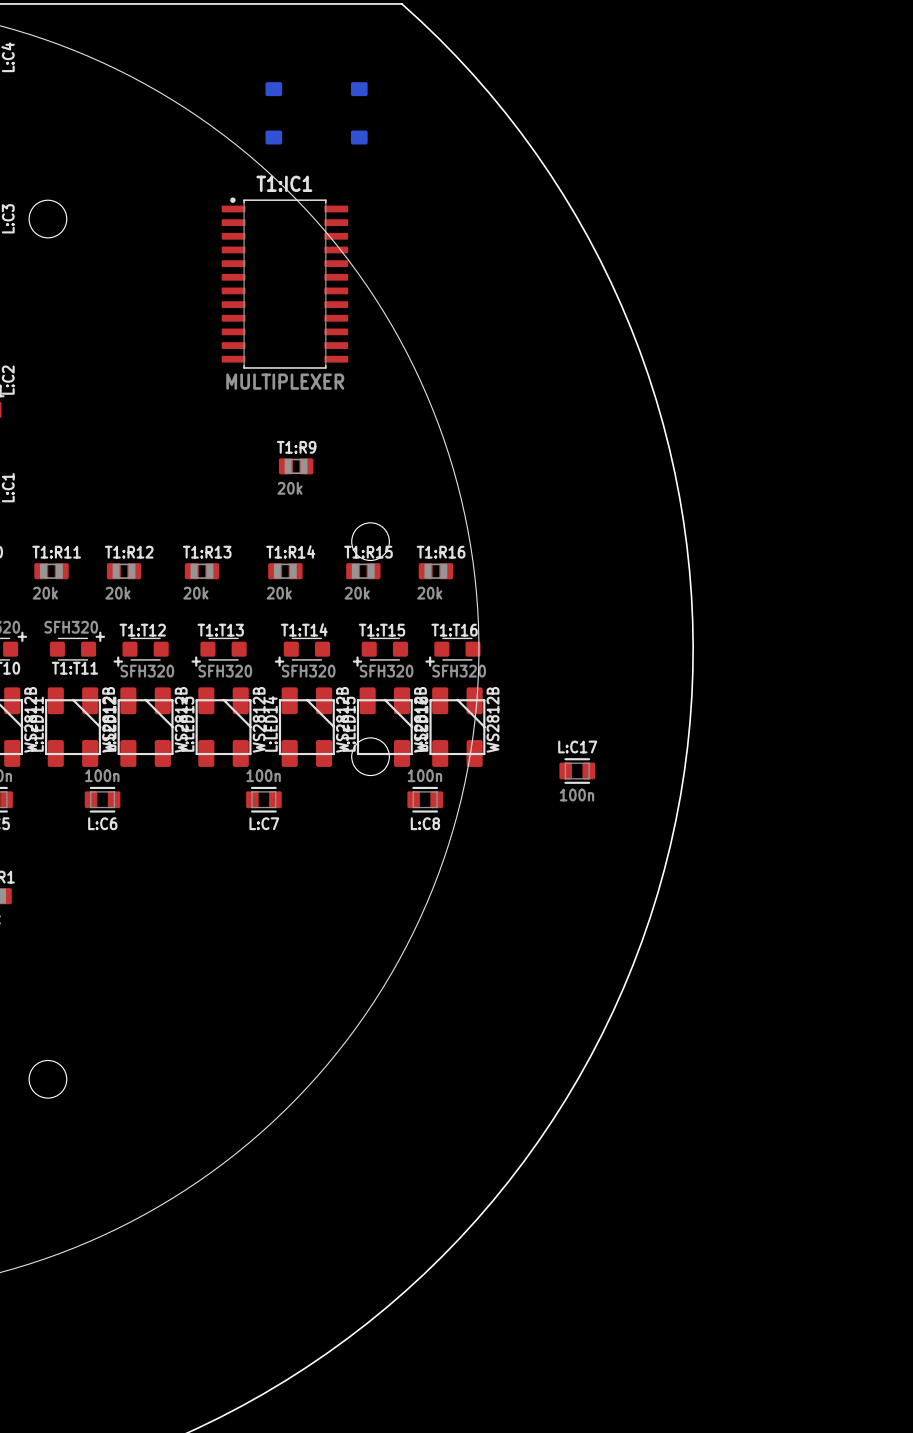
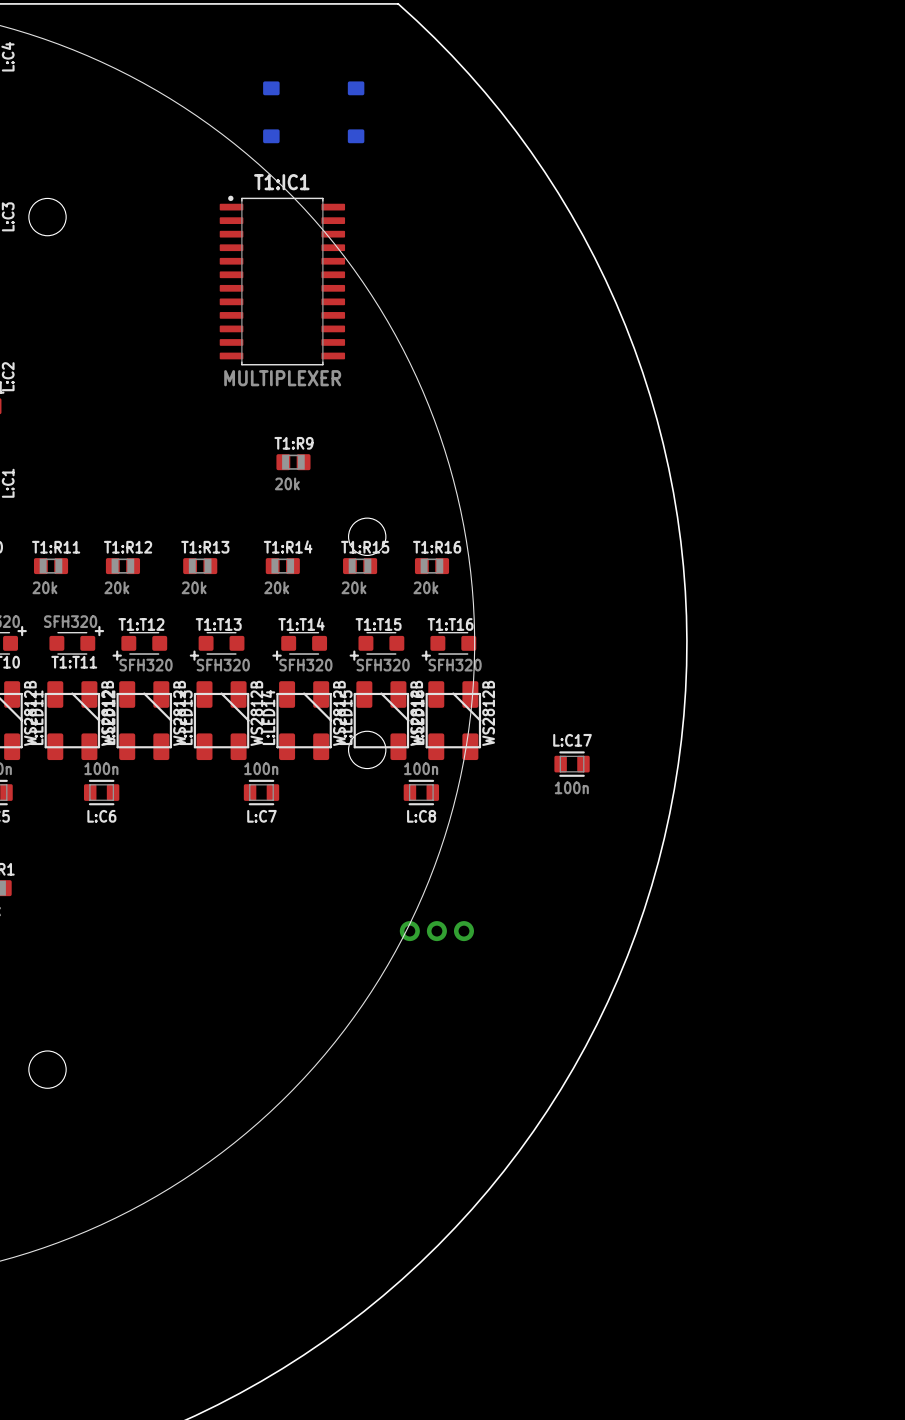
part: none -> (436, 931)

